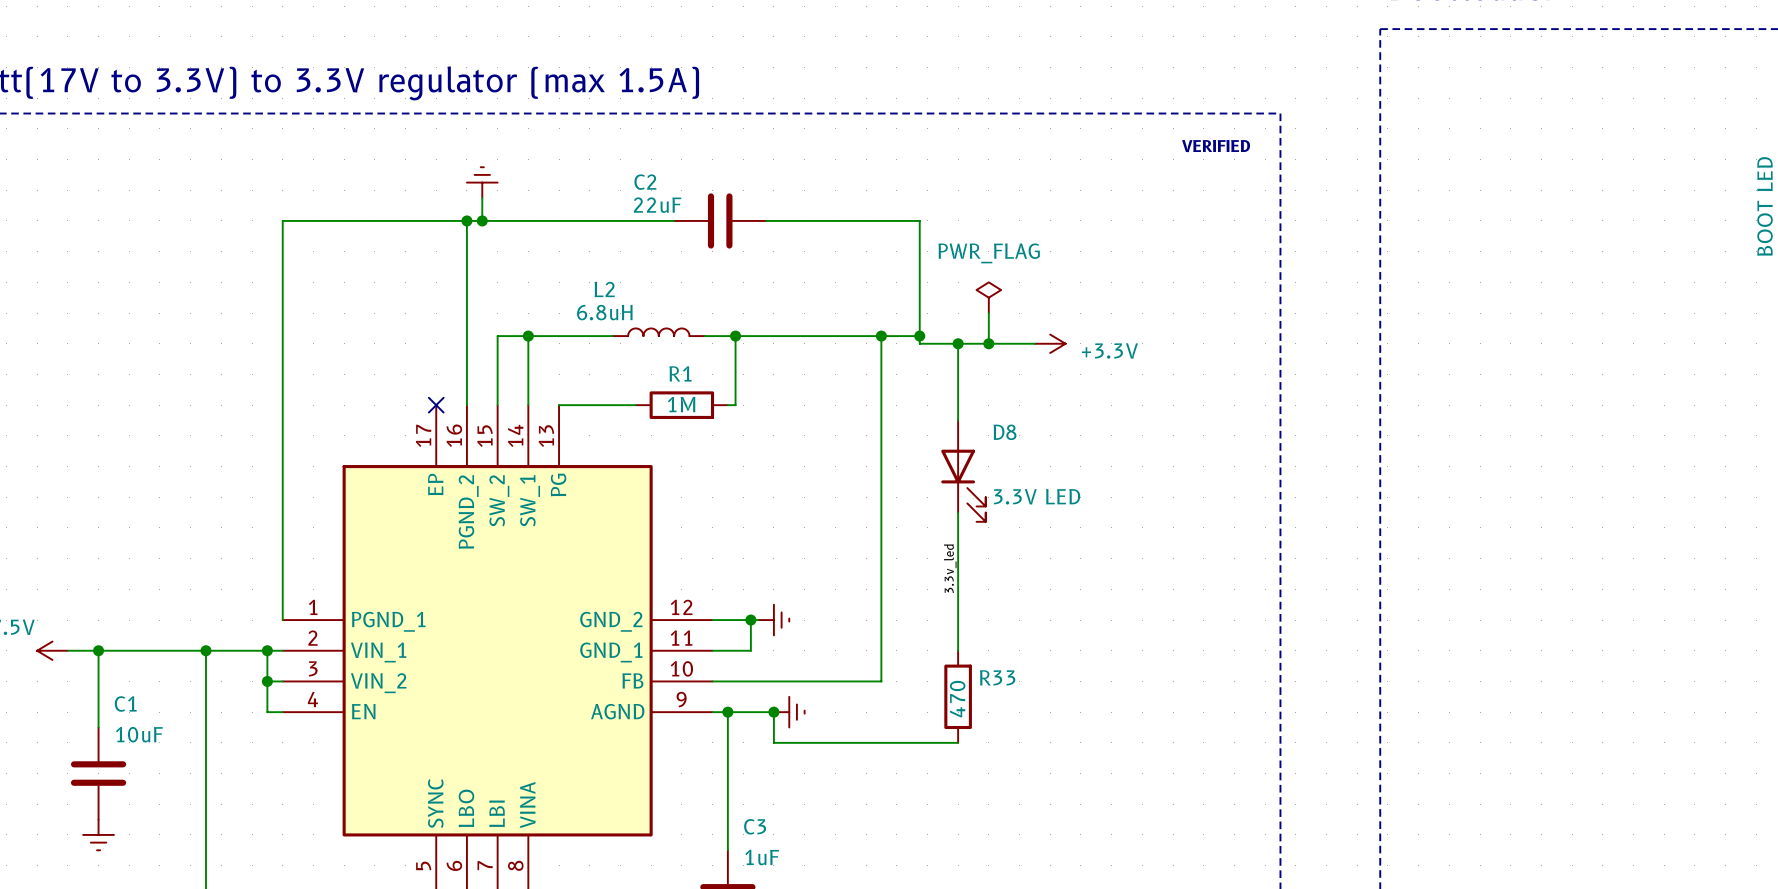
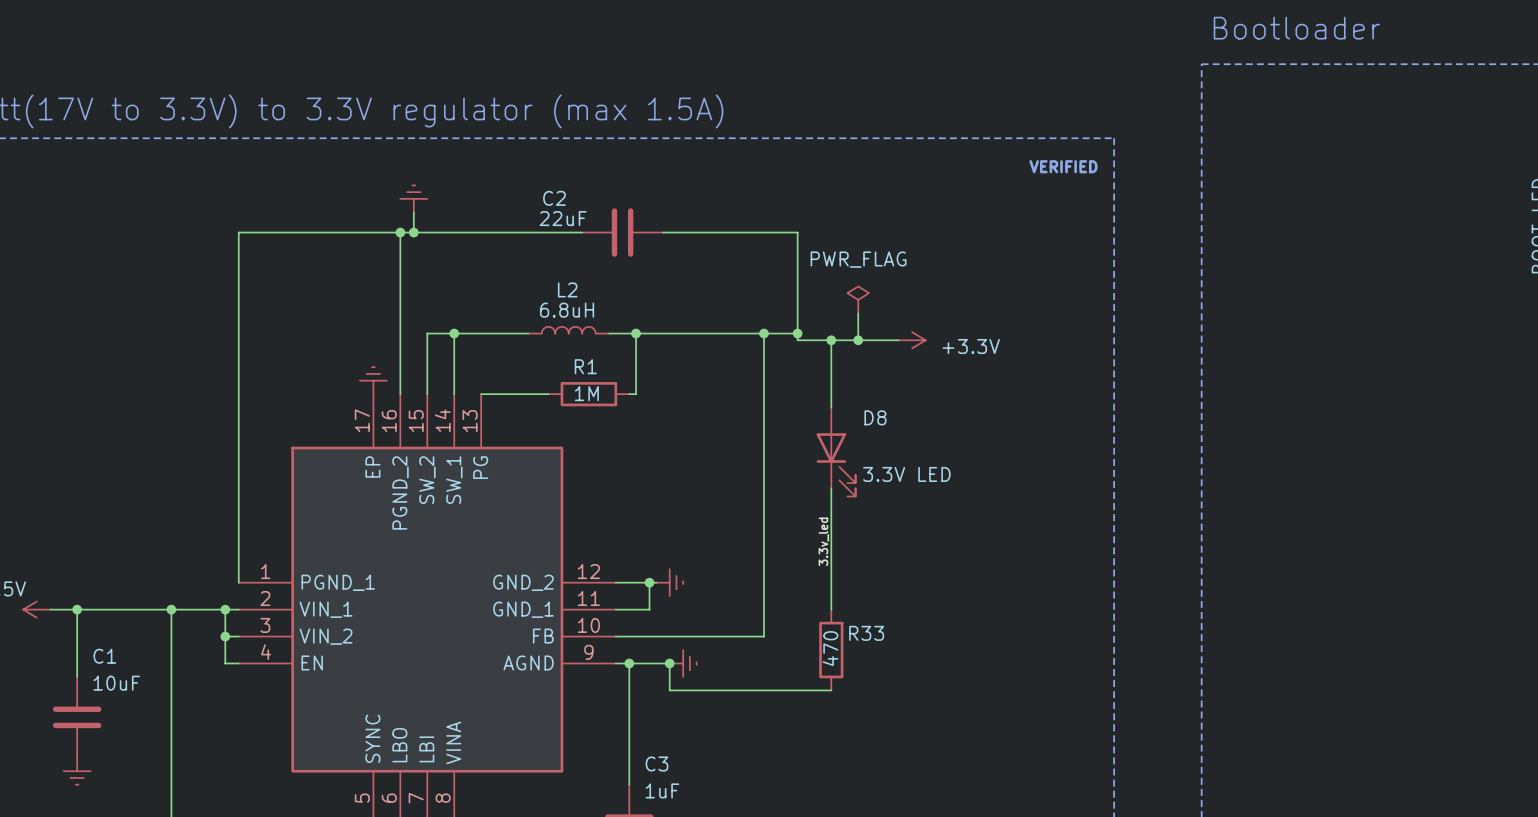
L2 name position: L2 (604, 289) -> L2 (567, 289)
L2 value position: 6.8uH (604, 312) -> 6.8uH (567, 310)
power symbol: none -> (373, 380)
no-connect mark: (436, 405) -> none

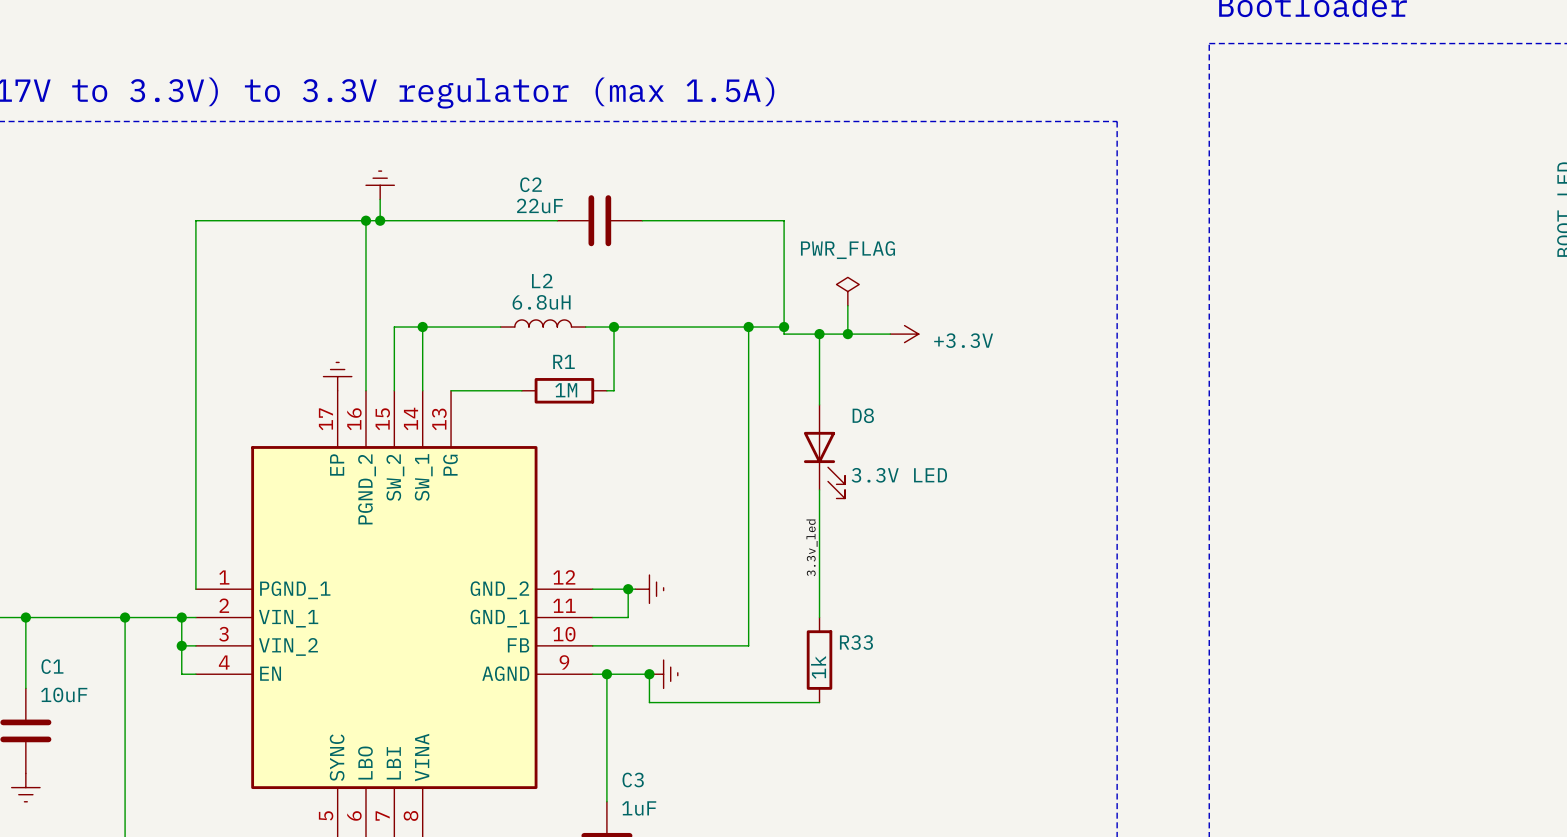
text: VERIFIED (1063, 166) -> none
R33 value: 470 (830, 648) -> 1k (818, 667)

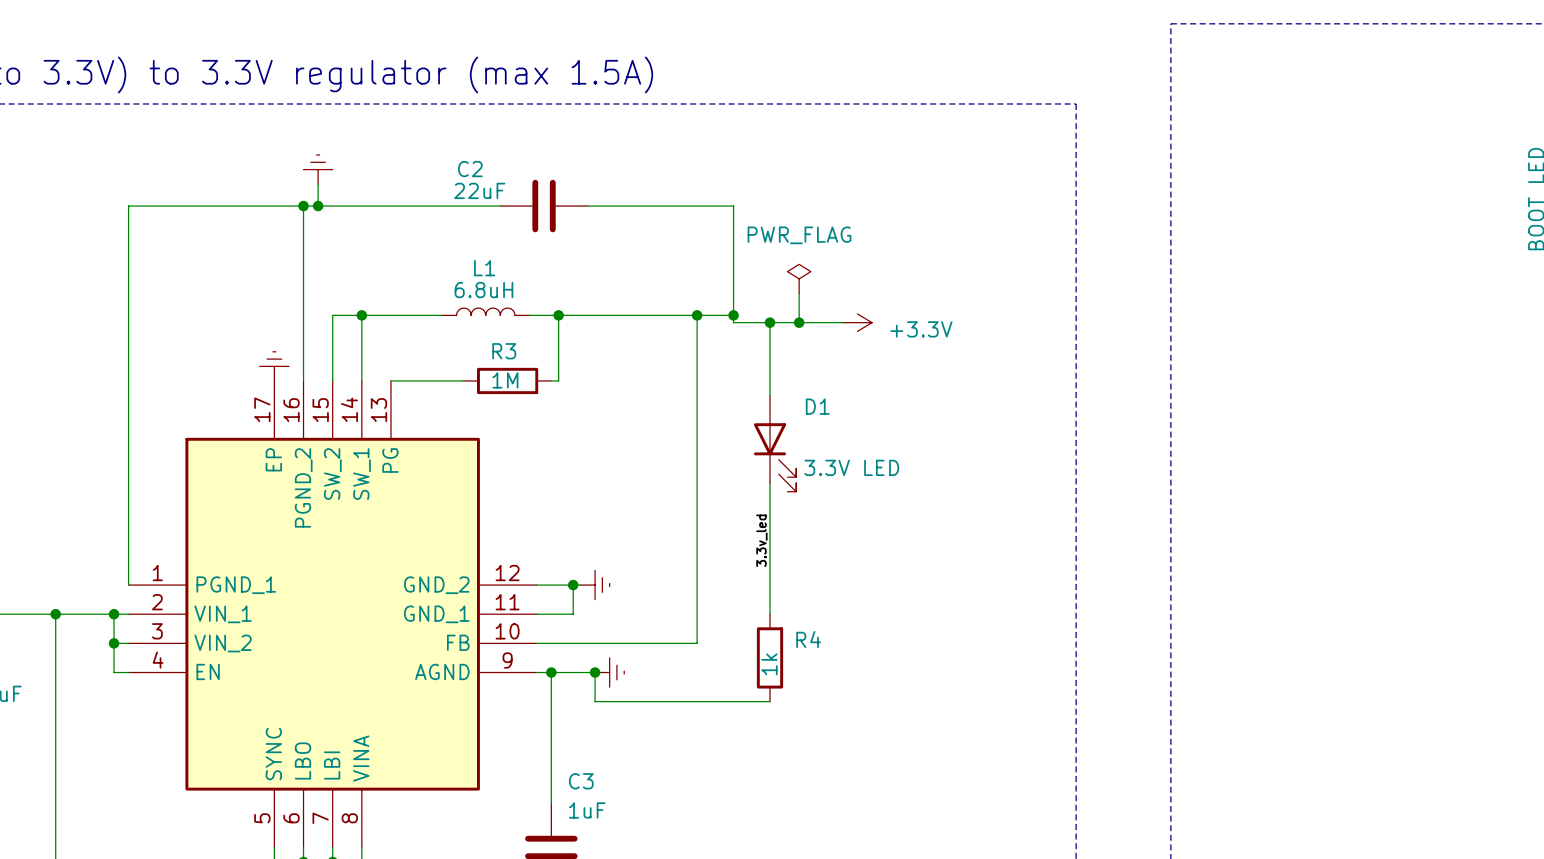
L2 name: L2 (542, 281) -> L1 (484, 268)
R1 name: R1 (564, 361) -> R3 (504, 351)
D8 name: D8 (863, 415) -> D1 (817, 406)
R33 name: R33 (856, 642) -> R4 (808, 639)

